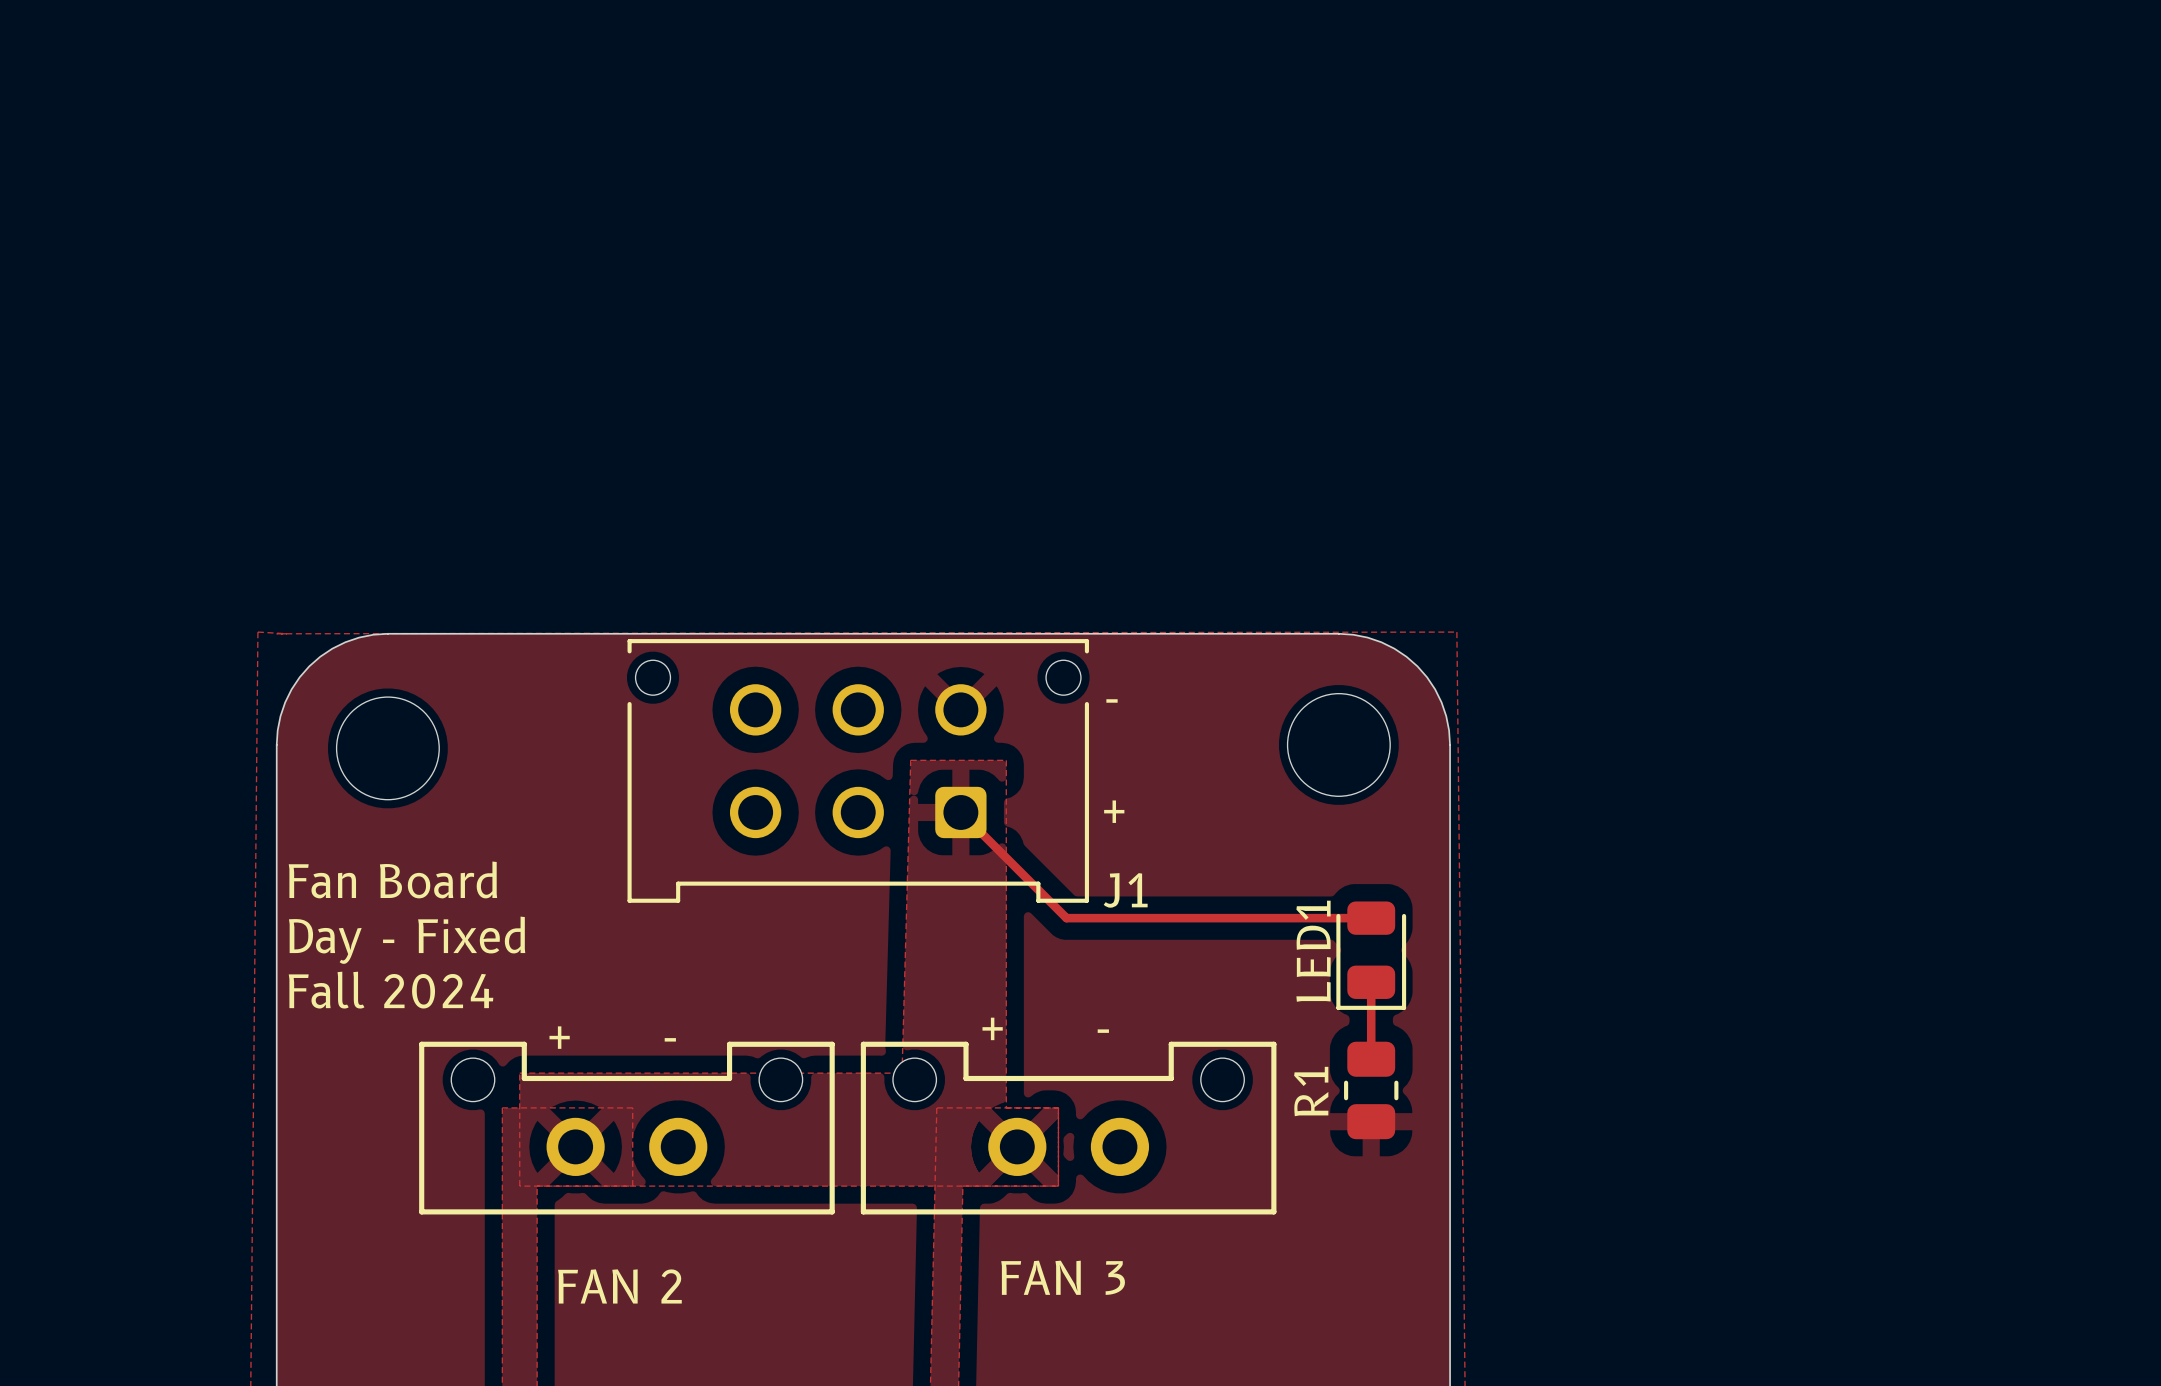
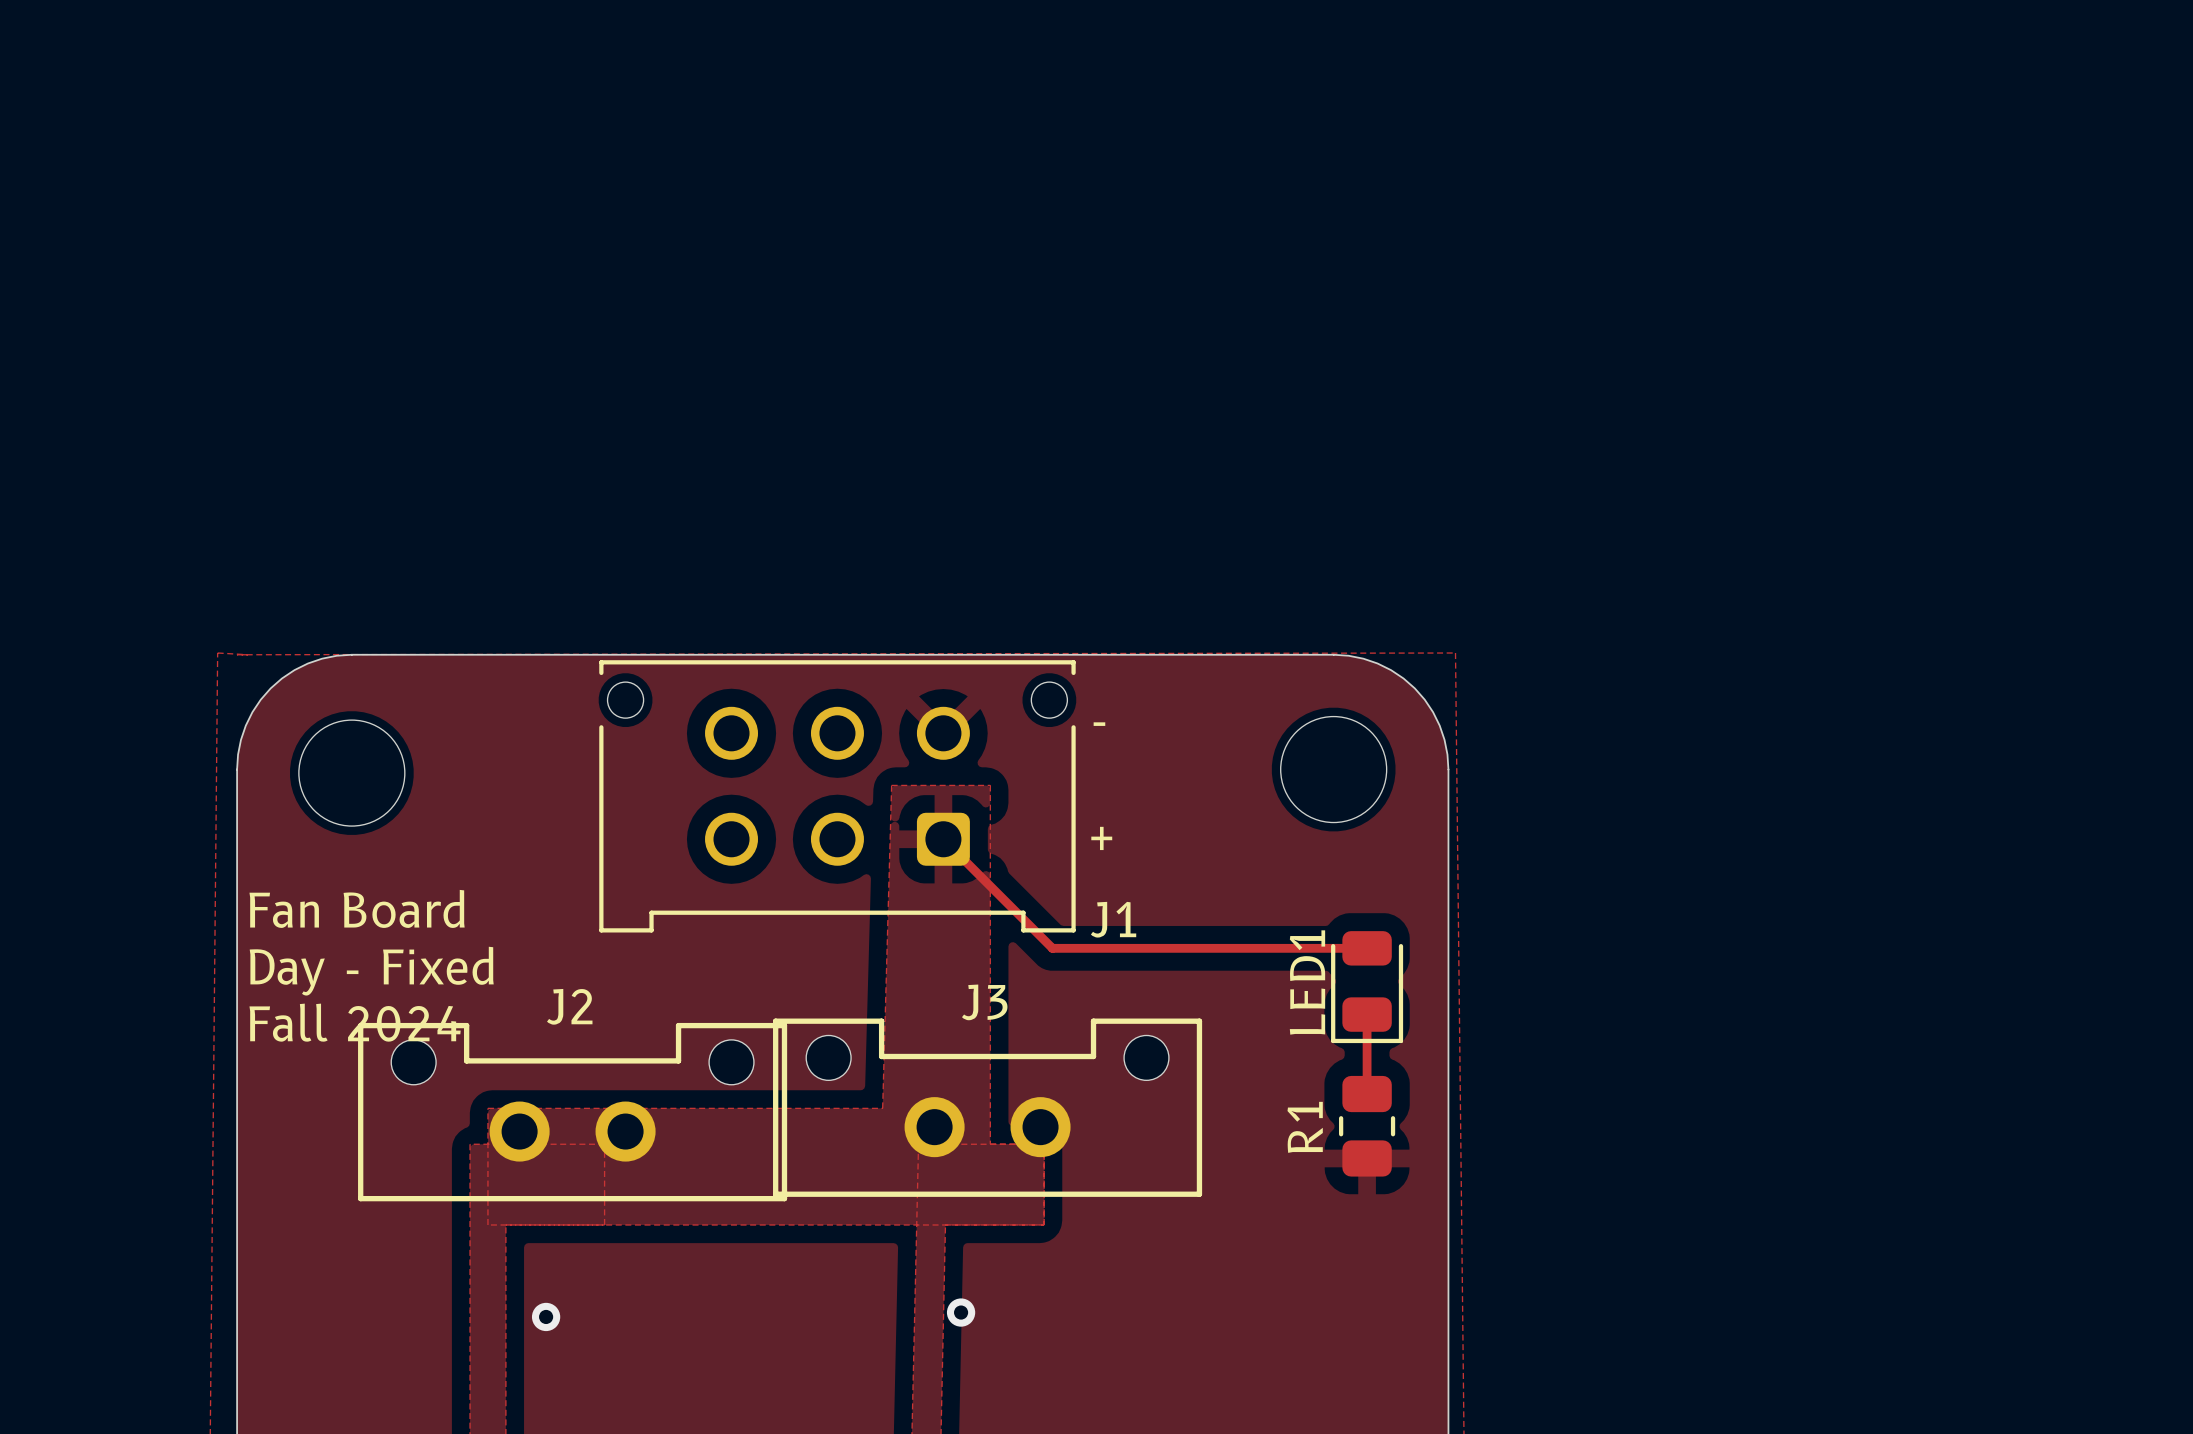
text: + (992, 1028) -> none
text: - (1103, 1031) -> none
text: + (559, 1037) -> none
text: - (670, 1039) -> none
J3: none -> (987, 1107)
J2: none -> (572, 1112)
part: (626, 1128) -> none
part: (1068, 1128) -> none
via: none -> (961, 1312)
via: none -> (546, 1316)
text: FAN 3 (1063, 1277) -> none
text: FAN 2 (619, 1286) -> none

